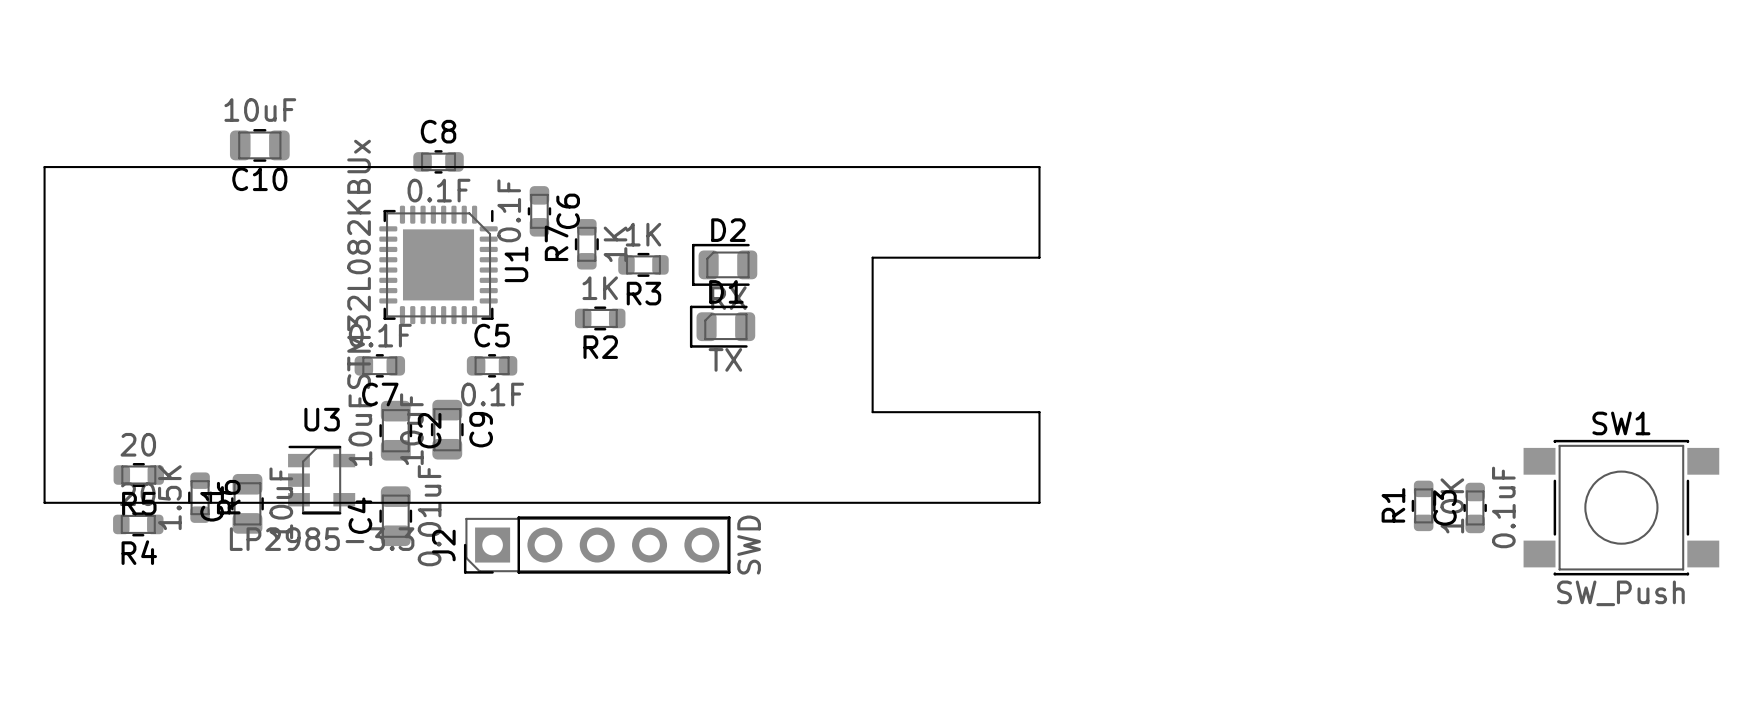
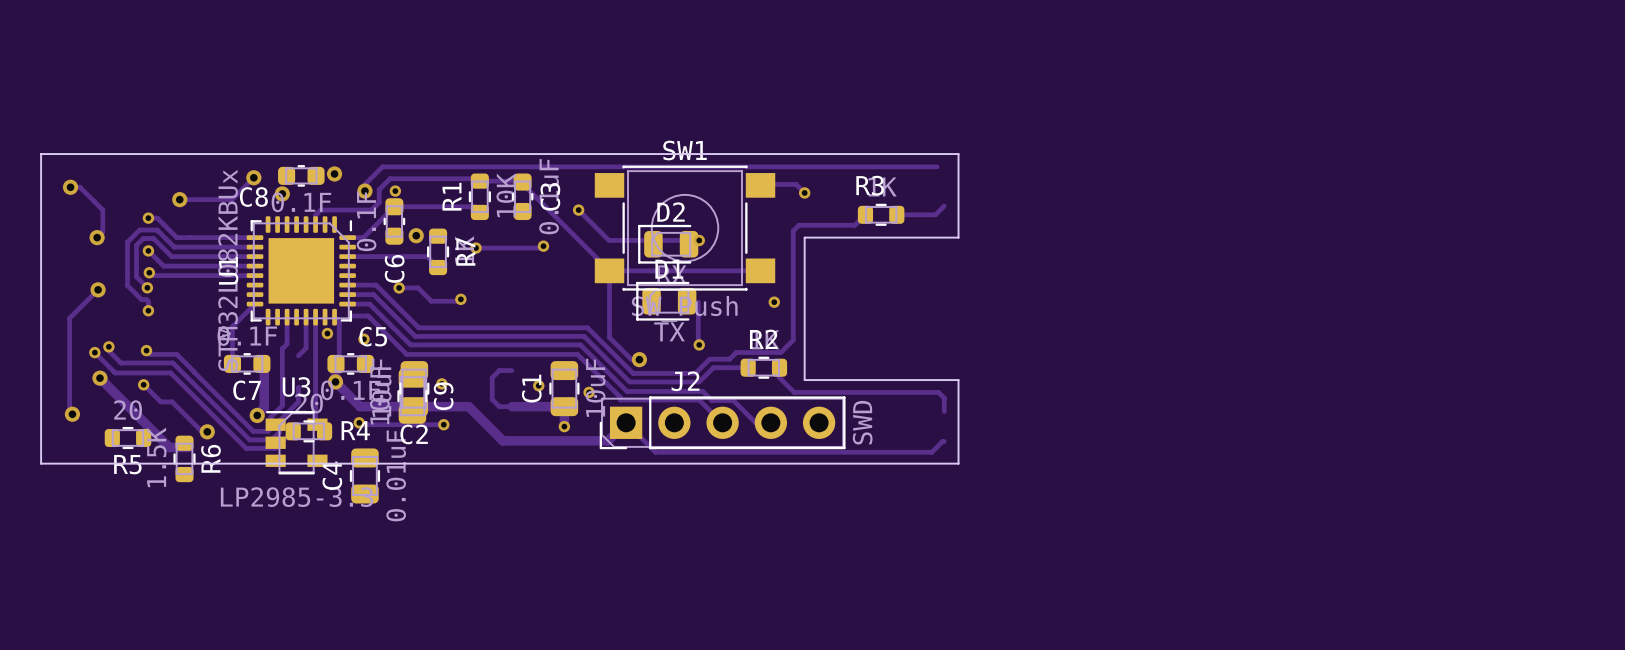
C8 name position: C8 (438, 131) -> C8 (253, 197)
C10: 10uF (259, 145) -> none
C8 position: (438, 161) -> (301, 175)
track: none -> (937, 166) (382, 166) (364, 184) (364, 191)
via: none -> (334, 173)
track: none -> (253, 177) (231, 199) (179, 199)
via: none -> (253, 177)
track: none -> (760, 185) (796, 184) (804, 192)
track: none -> (70, 187) (80, 187) (102, 210) (102, 231) (97, 237)
via: none -> (70, 187)
via: none -> (364, 191)
via: none -> (395, 191)
via: none -> (804, 192)
via: none -> (282, 193)
C6 position: (539, 211) -> (394, 221)
C6 name position: C6 (568, 211) -> C6 (394, 268)
via: none -> (179, 199)
track: none -> (944, 206) (935, 214) (896, 214)
track: none -> (578, 210) (609, 240) (699, 240)
via: none -> (578, 210)
track: none -> (479, 212) (474, 206) (394, 206) (363, 237) (347, 237)
track: none -> (865, 214) (855, 225) (798, 225) (793, 230) (793, 340) (780, 352) (736, 352) (729, 359) (709, 359) (695, 373) (633, 373) (587, 327) (418, 327) (376, 285) (347, 285)
track: none -> (148, 218) (157, 218) (176, 237) (255, 237)
via: none -> (148, 218)
track: none -> (315, 224) (315, 215) (320, 210) (371, 210) (379, 202) (379, 189) (390, 178) (477, 178) (479, 181) (521, 181) (609, 270)
R7 name position: R7 (556, 243) -> R7 (465, 251)
R7 position: (586, 244) -> (438, 251)
via: none -> (416, 235)
via: none -> (97, 237)
via: none -> (699, 240)
U1 position: (438, 264) -> (301, 270)
U1 name position: U1 (516, 264) -> U1 (228, 270)
R3 position: (643, 264) -> (881, 214)
track: none -> (543, 246) (541, 248) (476, 248)
via: none -> (543, 246)
track: none -> (255, 247) (174, 247) (157, 230) (139, 230) (127, 242) (127, 285) (141, 299) (148, 301) (148, 310)
via: none -> (476, 248)
track: none -> (148, 250) (163, 266) (255, 266)
via: none -> (148, 250)
track: none -> (255, 256) (171, 256) (153, 238) (143, 238) (136, 245) (136, 277) (147, 287)
track: none -> (347, 256) (427, 256) (438, 267)
R3 name position: R3 (643, 293) -> R3 (870, 185)
track: none -> (609, 270) (760, 270)
track: none -> (609, 270) (609, 337) (631, 359) (639, 359)
track: none -> (149, 272) (152, 275) (255, 275)
via: none -> (149, 272)
via: none -> (147, 287)
track: none -> (399, 287) (418, 287) (431, 301) (458, 301) (460, 299)
via: none -> (399, 287)
track: none -> (98, 289) (69, 318) (69, 413) (72, 414)
via: none -> (98, 289)
R2 position: (600, 318) -> (763, 367)
track: none -> (347, 294) (373, 294) (415, 336) (584, 336) (629, 381) (699, 381) (713, 367) (748, 367)
via: none -> (460, 299)
track: none -> (698, 302) (699, 344)
via: none -> (774, 302)
track: none -> (255, 304) (232, 326) (232, 363)
track: none -> (347, 304) (369, 304) (410, 344) (580, 344) (627, 391) (702, 391) (711, 400) (733, 400) (755, 422) (770, 422)
C5 name position: C5 (492, 335) -> C5 (373, 336)
via: none -> (148, 310)
track: none -> (350, 315) (368, 315) (406, 354) (577, 354) (620, 397) (620, 400) (699, 400) (722, 422)
track: none -> (287, 317) (287, 344) (282, 348) (282, 405) (270, 417) (270, 428) (268, 431) (253, 431) (176, 354) (150, 354) (146, 350)
track: none -> (306, 317) (306, 348) (298, 355)
track: none -> (315, 317) (315, 421) (324, 431)
track: none -> (334, 317) (339, 321) (339, 360) (335, 363)
R2 name position: R2 (600, 347) -> R2 (763, 339)
via: none -> (327, 333)
C7 position: (379, 365) -> (247, 363)
C5 position: (492, 365) -> (350, 363)
via: none -> (364, 339)
via: none -> (699, 344)
track: none -> (108, 346) (108, 351) (120, 362) (172, 362) (249, 439) (271, 439) (279, 432) (279, 420) (298, 401) (298, 387)
via: none -> (108, 346)
via: none -> (146, 350)
track: none -> (94, 352) (115, 372) (170, 372) (246, 448) (275, 448) (293, 431)
via: none -> (94, 352)
via: none -> (639, 359)
track: none -> (335, 363) (335, 381) (360, 406) (468, 406) (502, 440) (608, 440) (626, 422) (655, 452) (931, 452) (944, 441)
track: none -> (260, 365) (261, 363) (264, 366) (264, 407) (257, 415)
track: none -> (779, 367) (779, 377) (794, 392) (938, 392) (944, 398) (944, 411)
track: none -> (511, 370) (499, 370) (492, 377) (492, 399) (499, 406) (564, 406) (564, 426)
track: none -> (99, 378) (169, 447) (188, 447)
via: none -> (99, 378)
via: none -> (335, 381)
via: none -> (441, 383)
track: none -> (143, 384) (160, 401) (172, 401) (202, 431) (207, 431)
via: none -> (143, 384)
via: none -> (538, 385)
via: none -> (589, 392)
C2 position: (395, 430) -> (414, 388)
C2 name rotation: 0° (429, 430) -> 90° clockwise (414, 434)
via: none -> (72, 414)
via: none -> (257, 415)
track: none -> (359, 422) (361, 424) (443, 424)
via: none -> (359, 422)
via: none -> (443, 424)
via: none -> (564, 426)
via: none -> (207, 431)
C1 position: (247, 503) -> (564, 388)
R1 position: (1423, 505) -> (479, 196)
C3 name position: C3 (1444, 507) -> C3 (550, 196)
C3 position: (1475, 507) -> (522, 196)
SW1 position: (1621, 507) -> (685, 228)
R4 position: (138, 524) -> (308, 431)
J2 name rotation: 0° (443, 545) -> 90° clockwise (685, 381)
J2 name position: J2 (443, 545) -> J2 (685, 381)
J2 position: (597, 545) -> (722, 422)
R4 name position: R4 (139, 552) -> R4 (355, 430)

